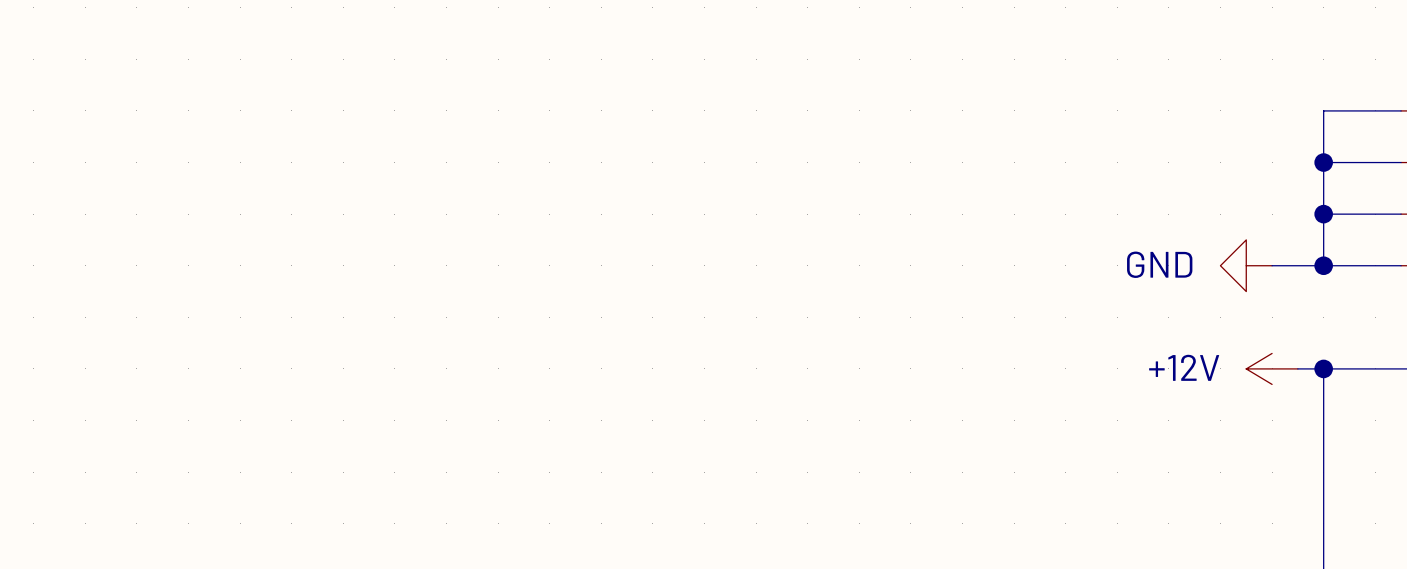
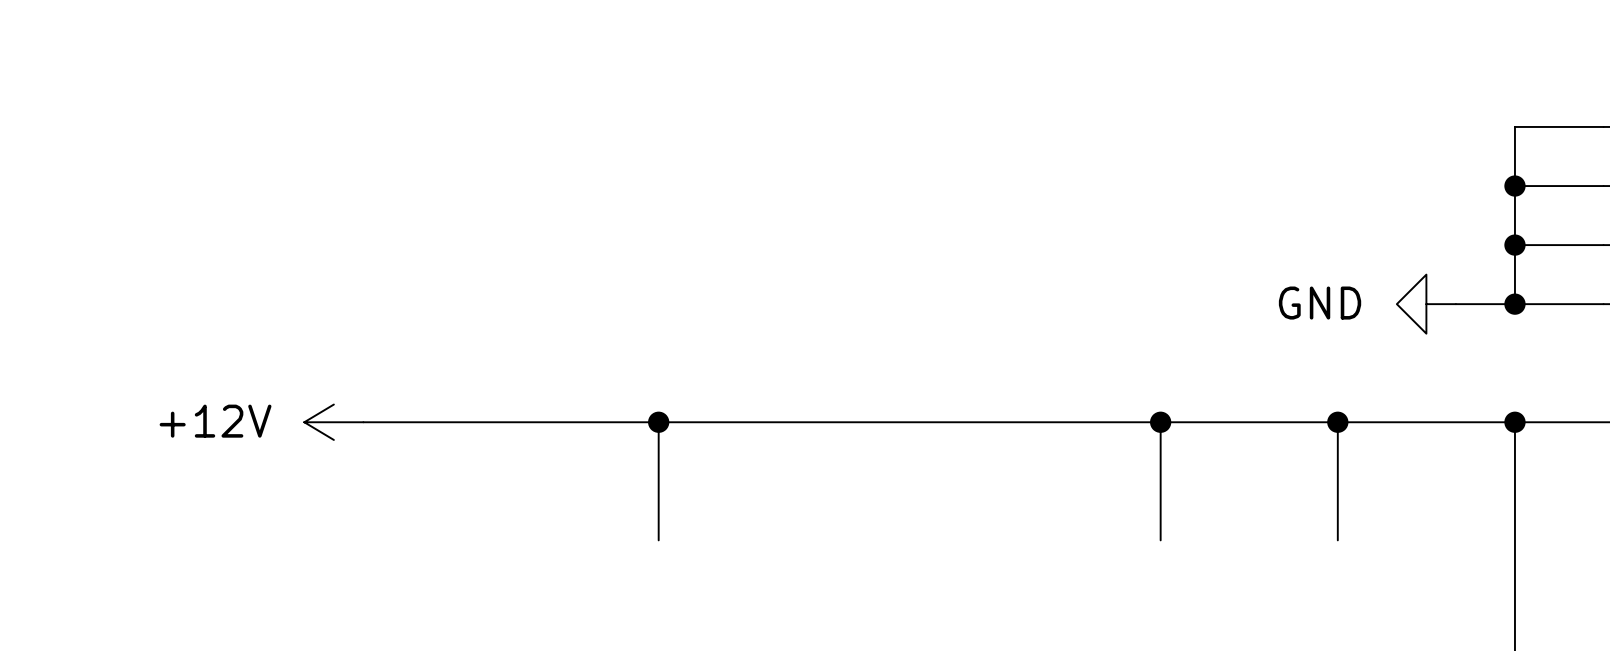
power symbol: none -> +12V (333, 422)
wire: none -> (363, 422) (1485, 422)
wire: none -> (658, 422) (658, 540)
junction: none -> (658, 422)
wire: none -> (1160, 422) (1160, 540)
junction: none -> (1160, 422)
wire: none -> (1337, 422) (1337, 540)
junction: none -> (1337, 422)
power symbol: +12V (1272, 368) -> none

